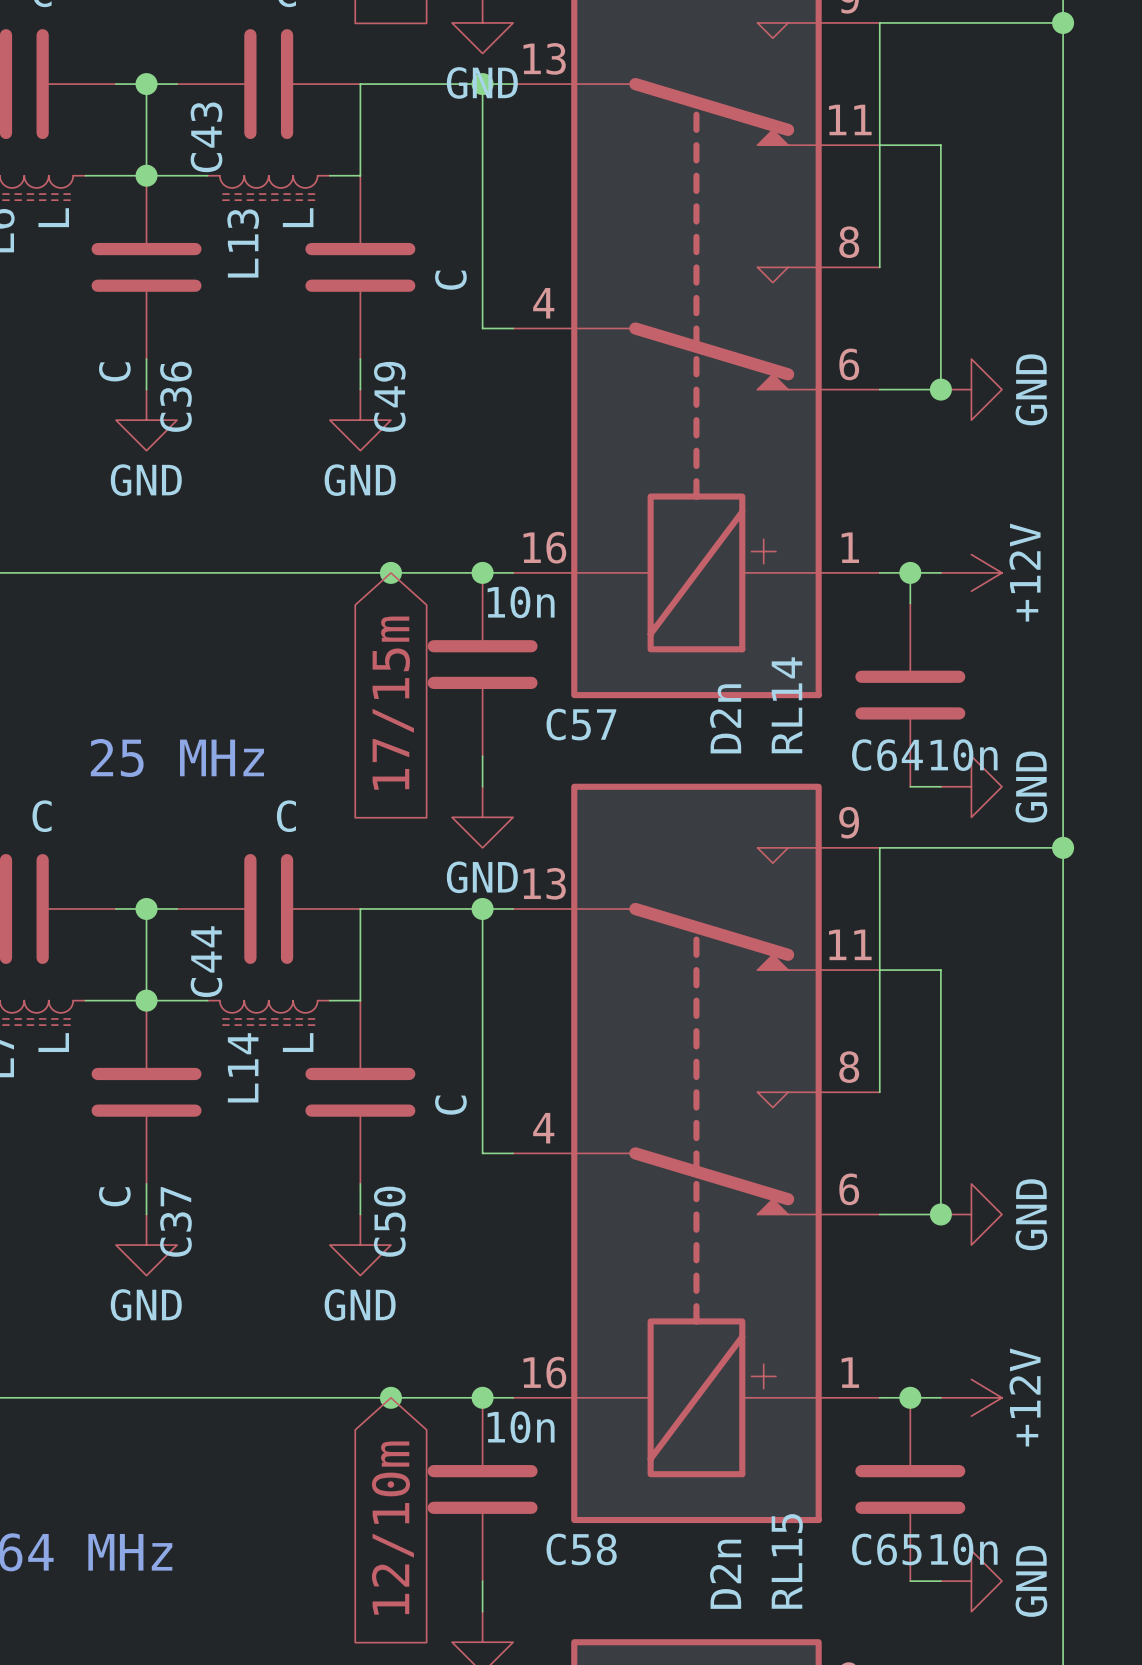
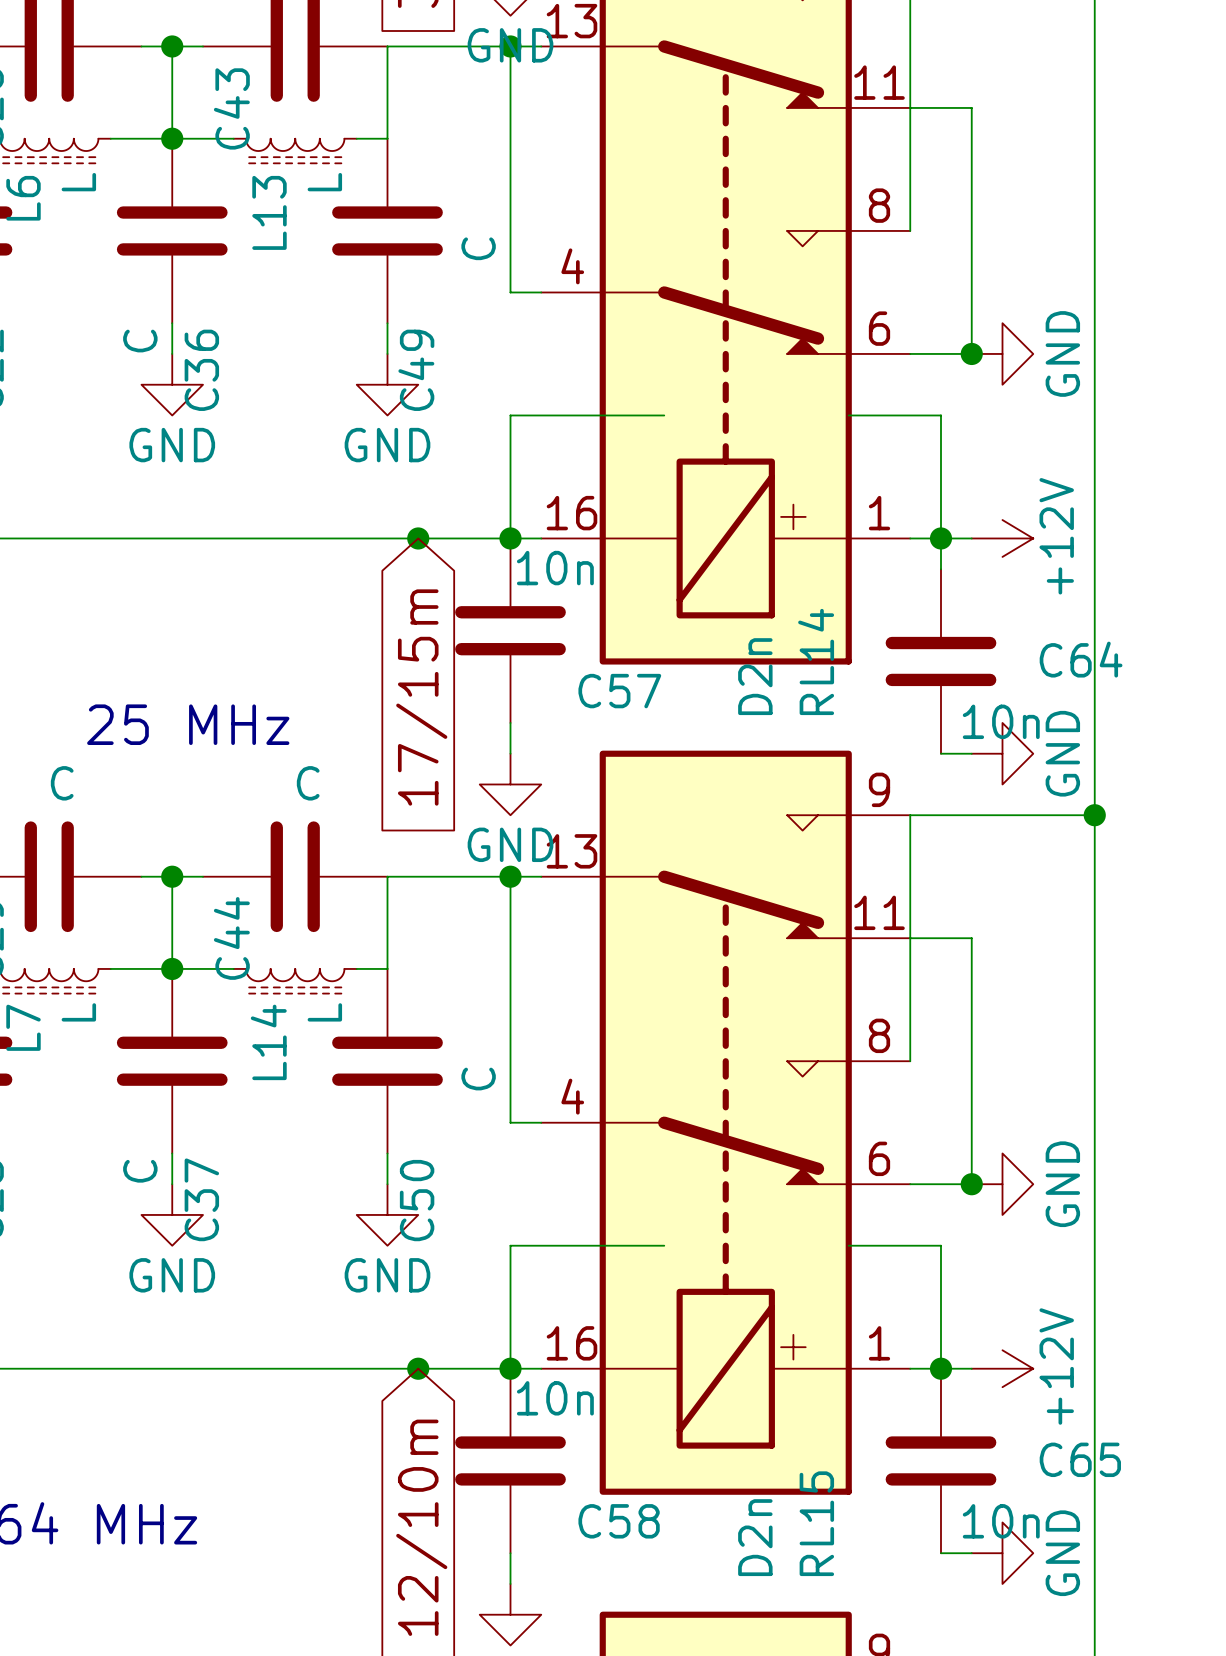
wire: none -> (664, 415) (510, 415) (510, 538)
wire: none -> (848, 415) (940, 415) (940, 538)
C64 name position: C64 (887, 755) -> C64 (1081, 659)
wire: none -> (664, 1245) (510, 1245) (510, 1368)
wire: none -> (848, 1245) (940, 1245) (940, 1368)
C65 name position: C65 (886, 1549) -> C65 (1080, 1459)

